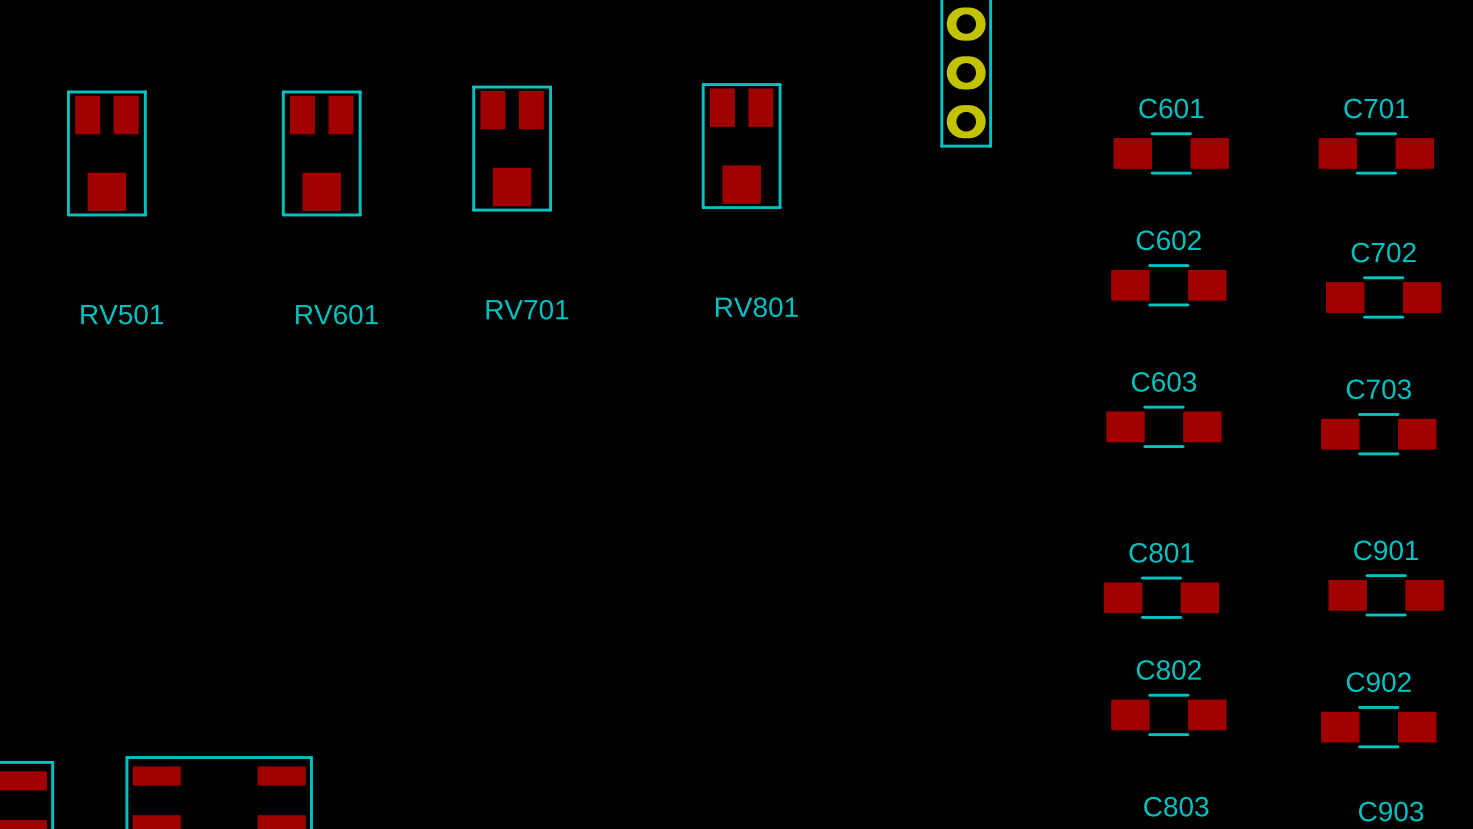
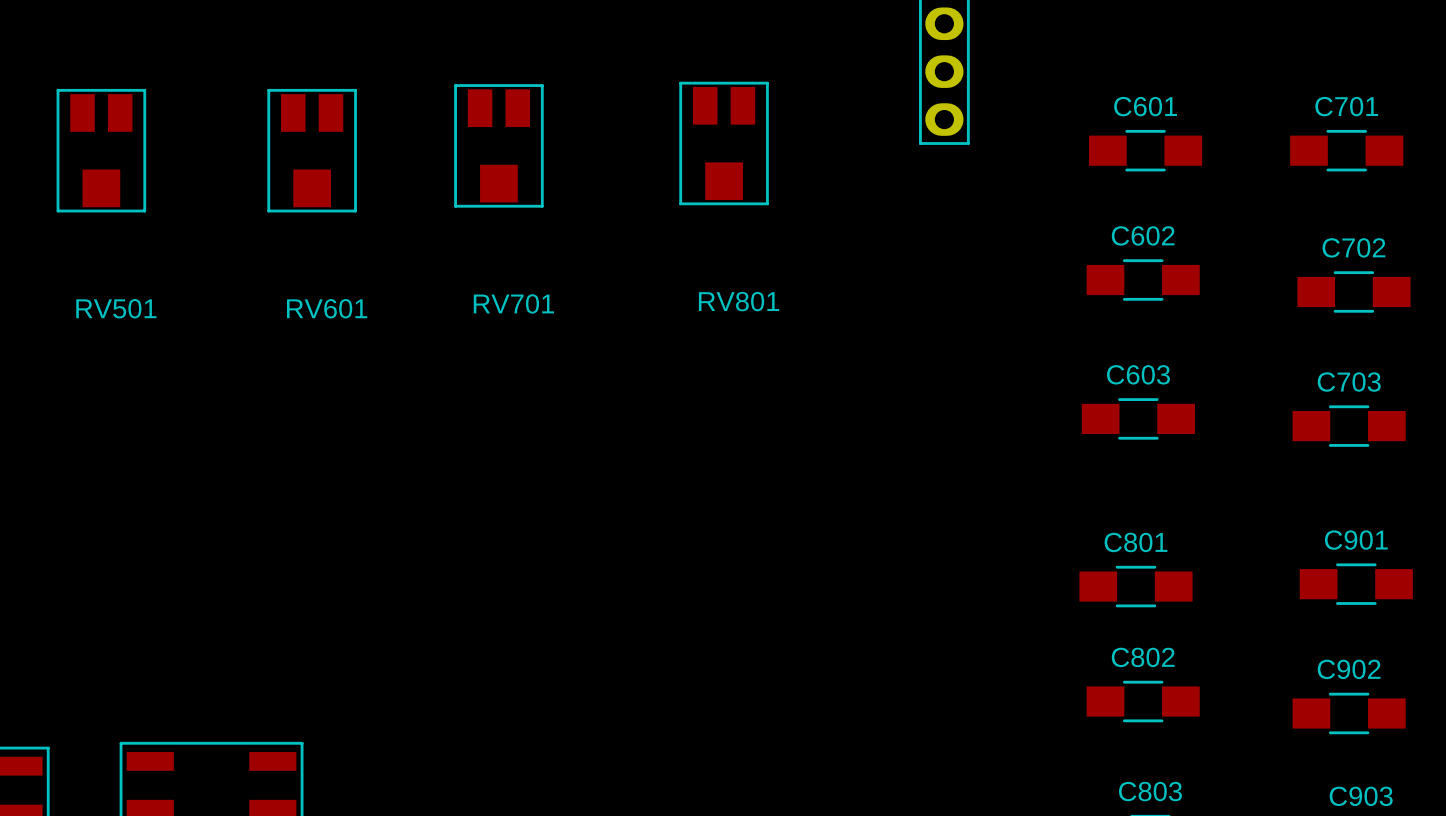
RV801 footprint: [701, 83, 782, 210] -> [679, 81, 769, 206]
RV701 footprint: [472, 85, 553, 212] -> [454, 84, 544, 208]
RV501 footprint: [67, 90, 147, 217] -> [56, 88, 147, 213]
RV601 footprint: [281, 90, 362, 217] -> [267, 88, 357, 213]

